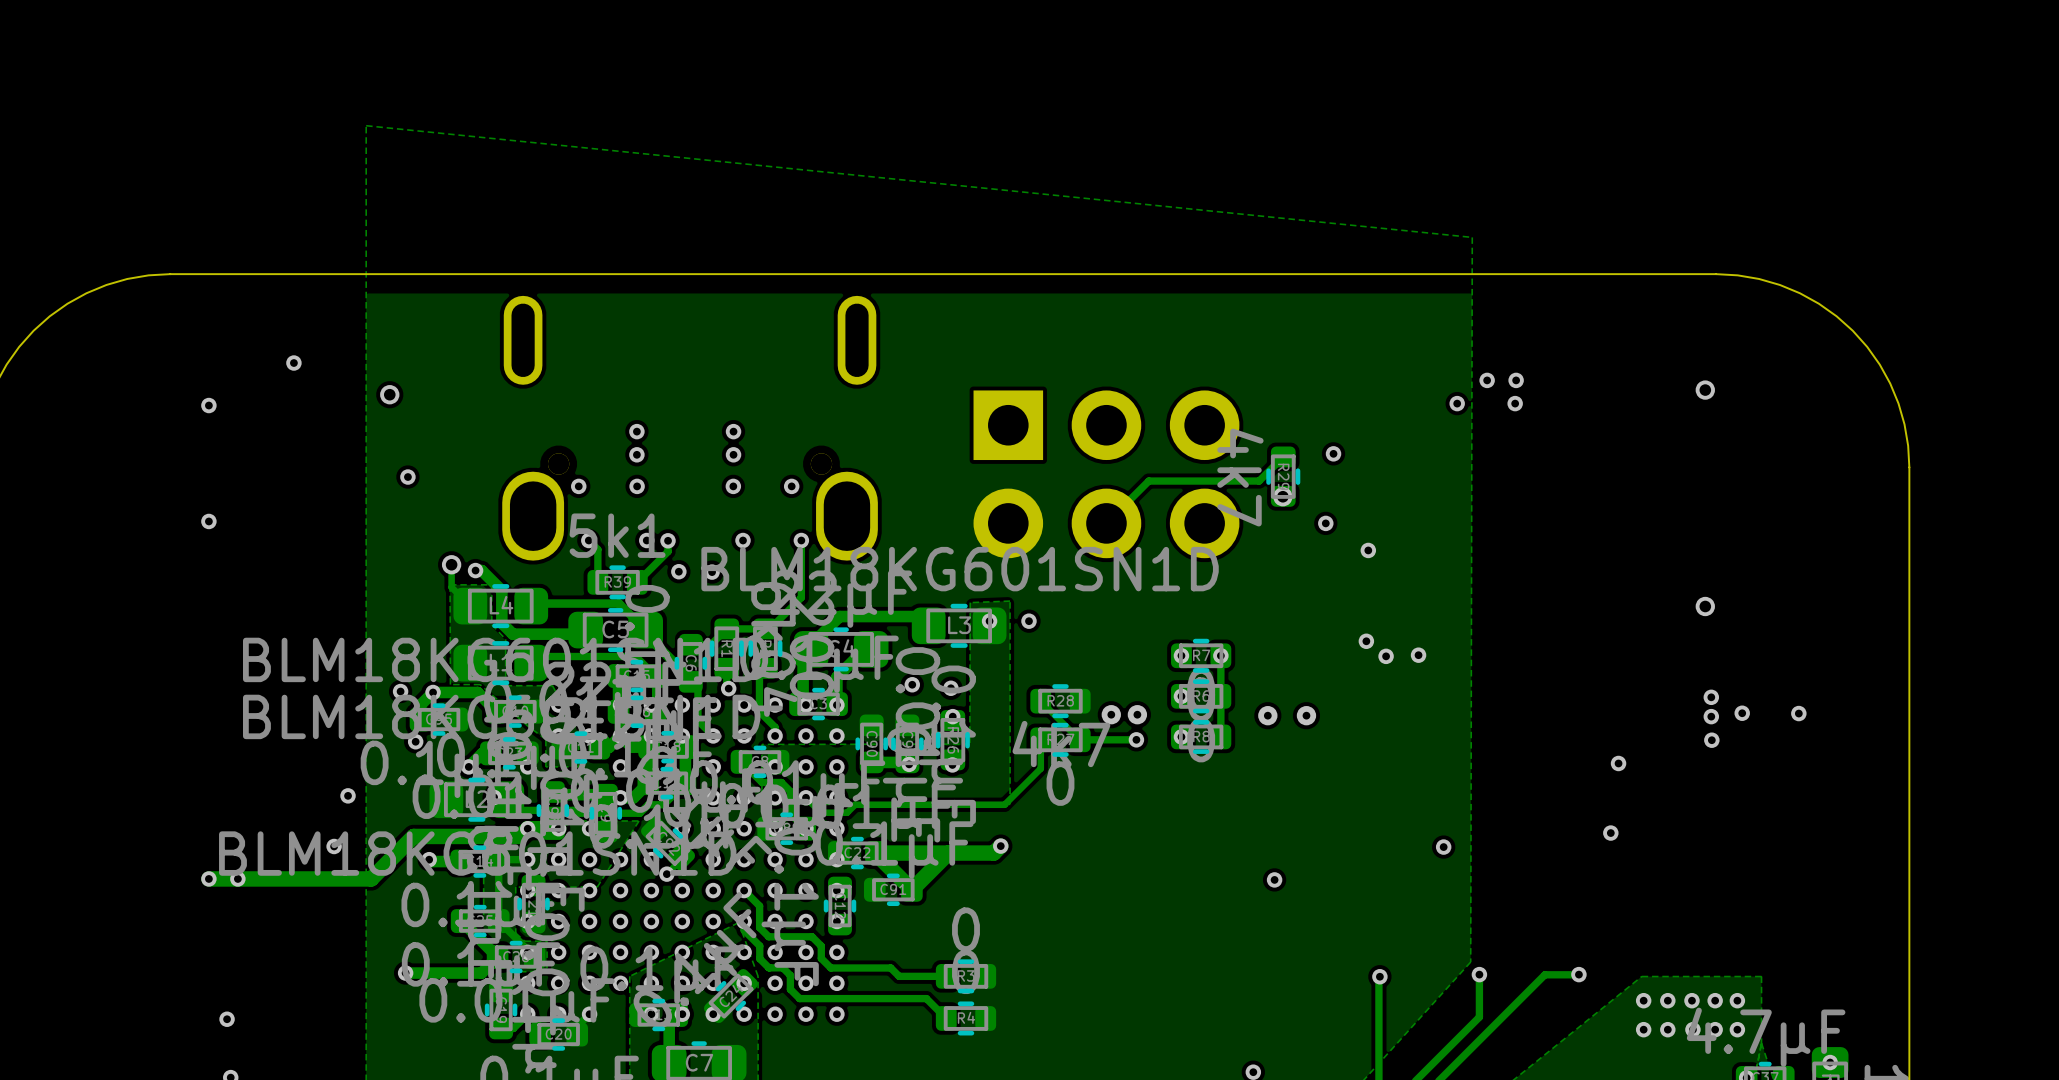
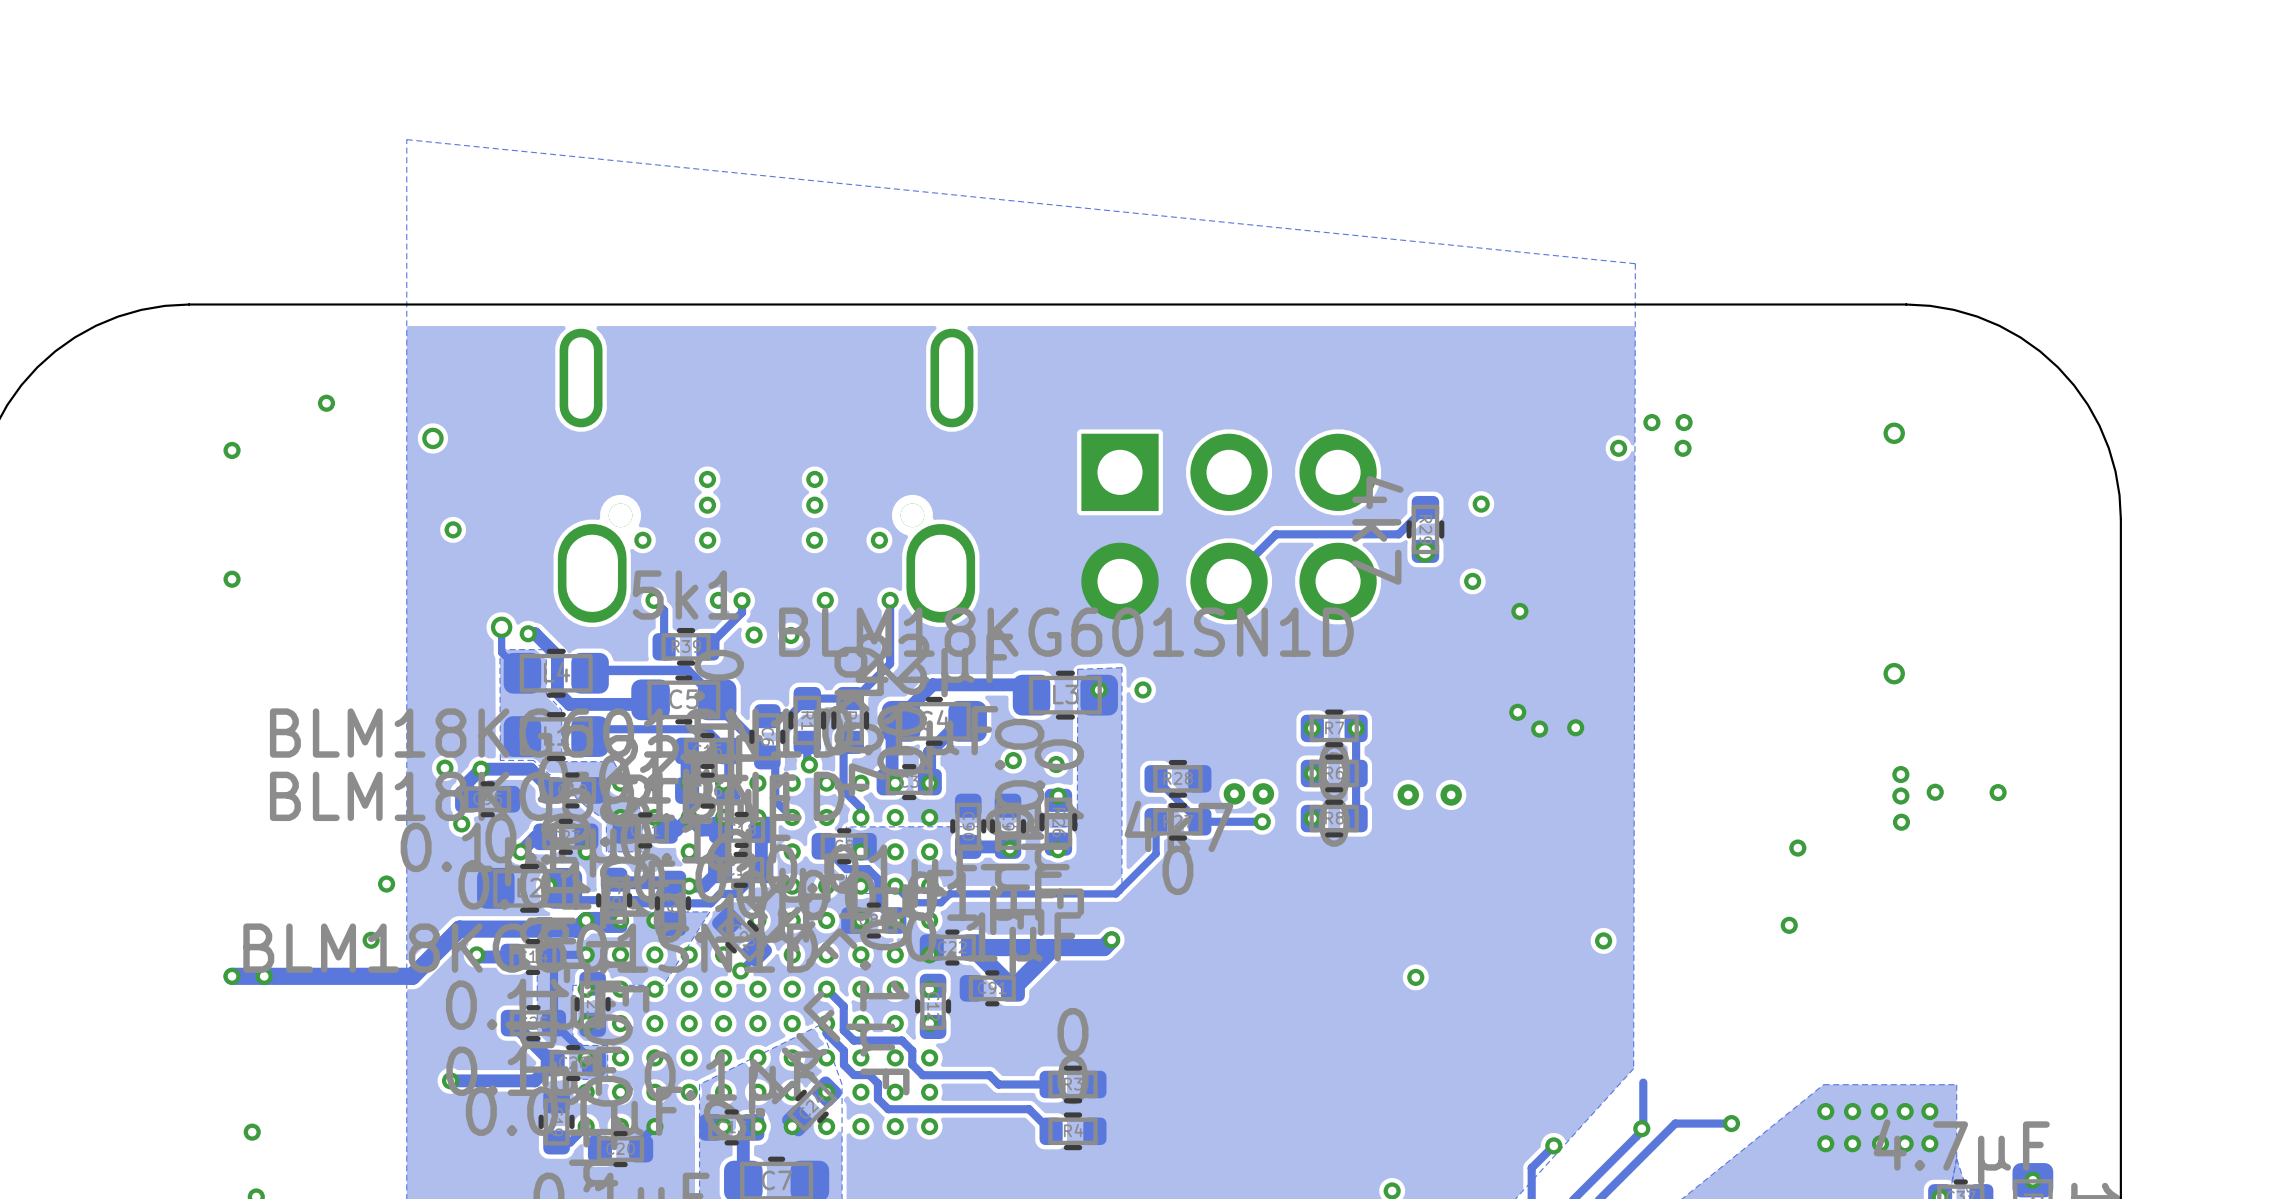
via position: (1479, 974) -> (1641, 1128)
track: (1578, 974) (1544, 974) (1508, 1011) -> (1731, 1123) (1675, 1123)
via position: (1578, 974) -> (1731, 1123)
track: (1379, 976) (1378, 1051) -> (1553, 1145) (1531, 1168)
via: (1379, 976) -> none
via: none -> (1553, 1145)

